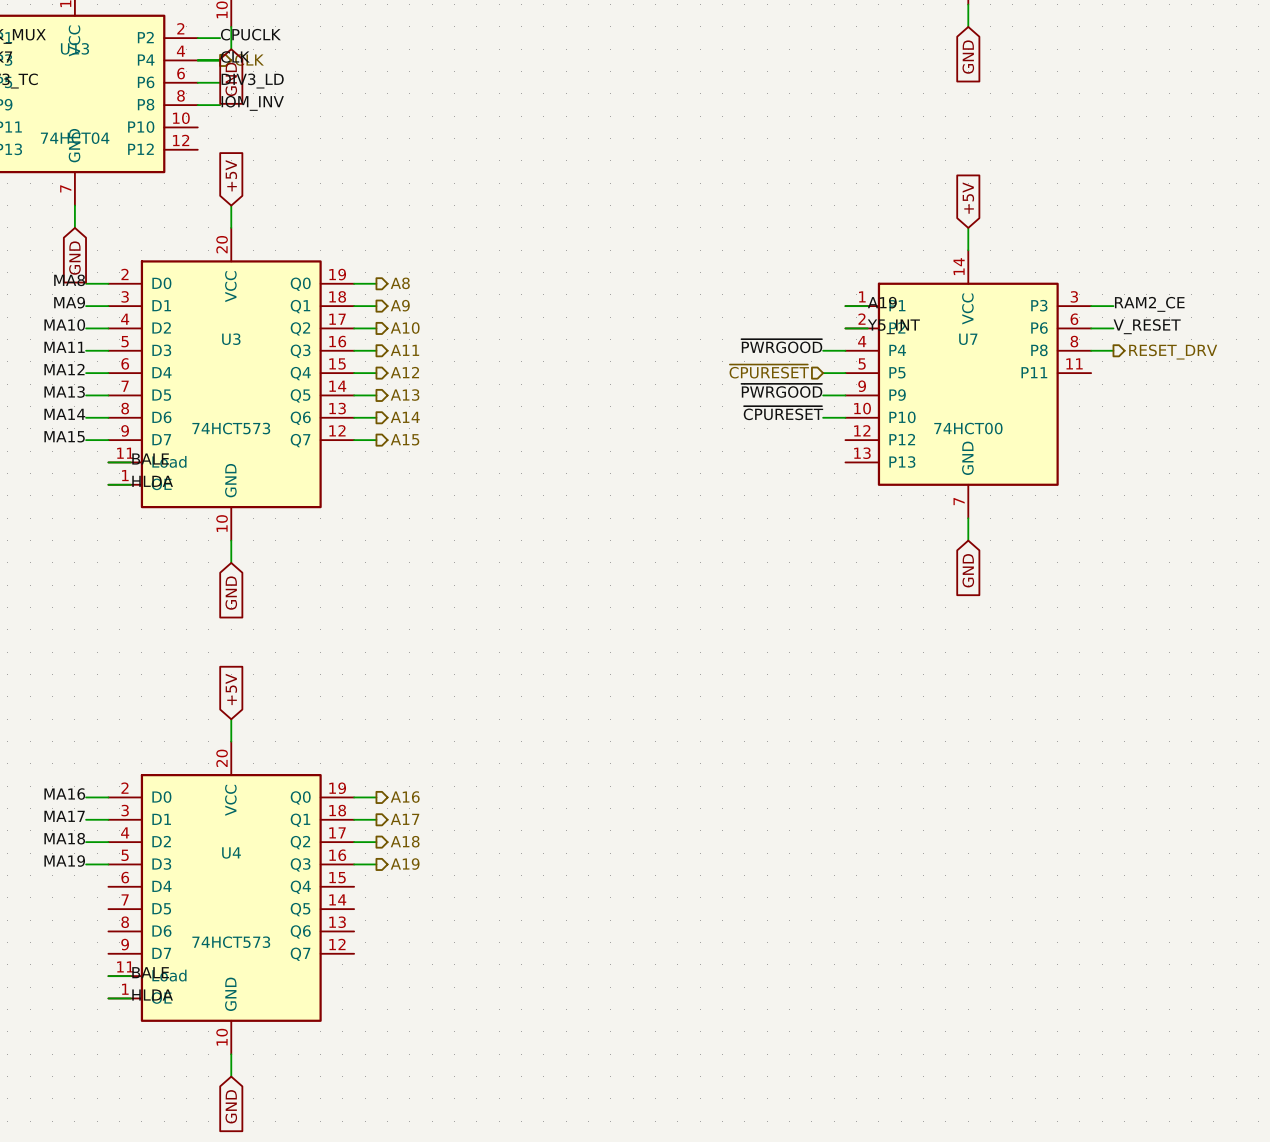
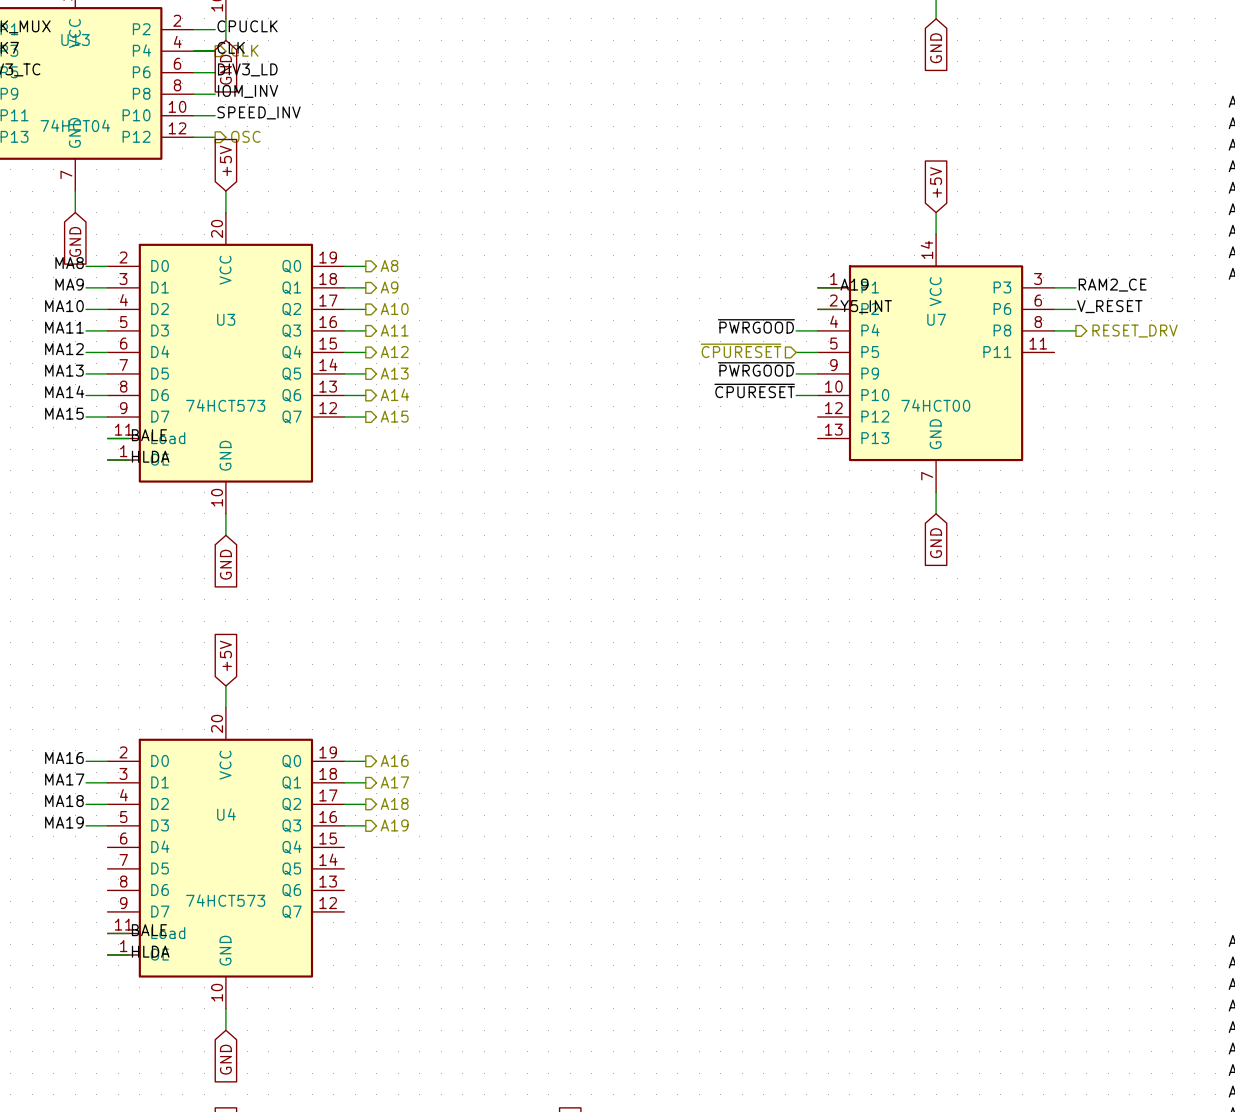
label: none -> SPEED_INV (259, 112)
wire: none -> (193, 115) (215, 115)
wire: none -> (193, 137) (215, 137)
hierarchical label: none -> OSC (245, 136)

